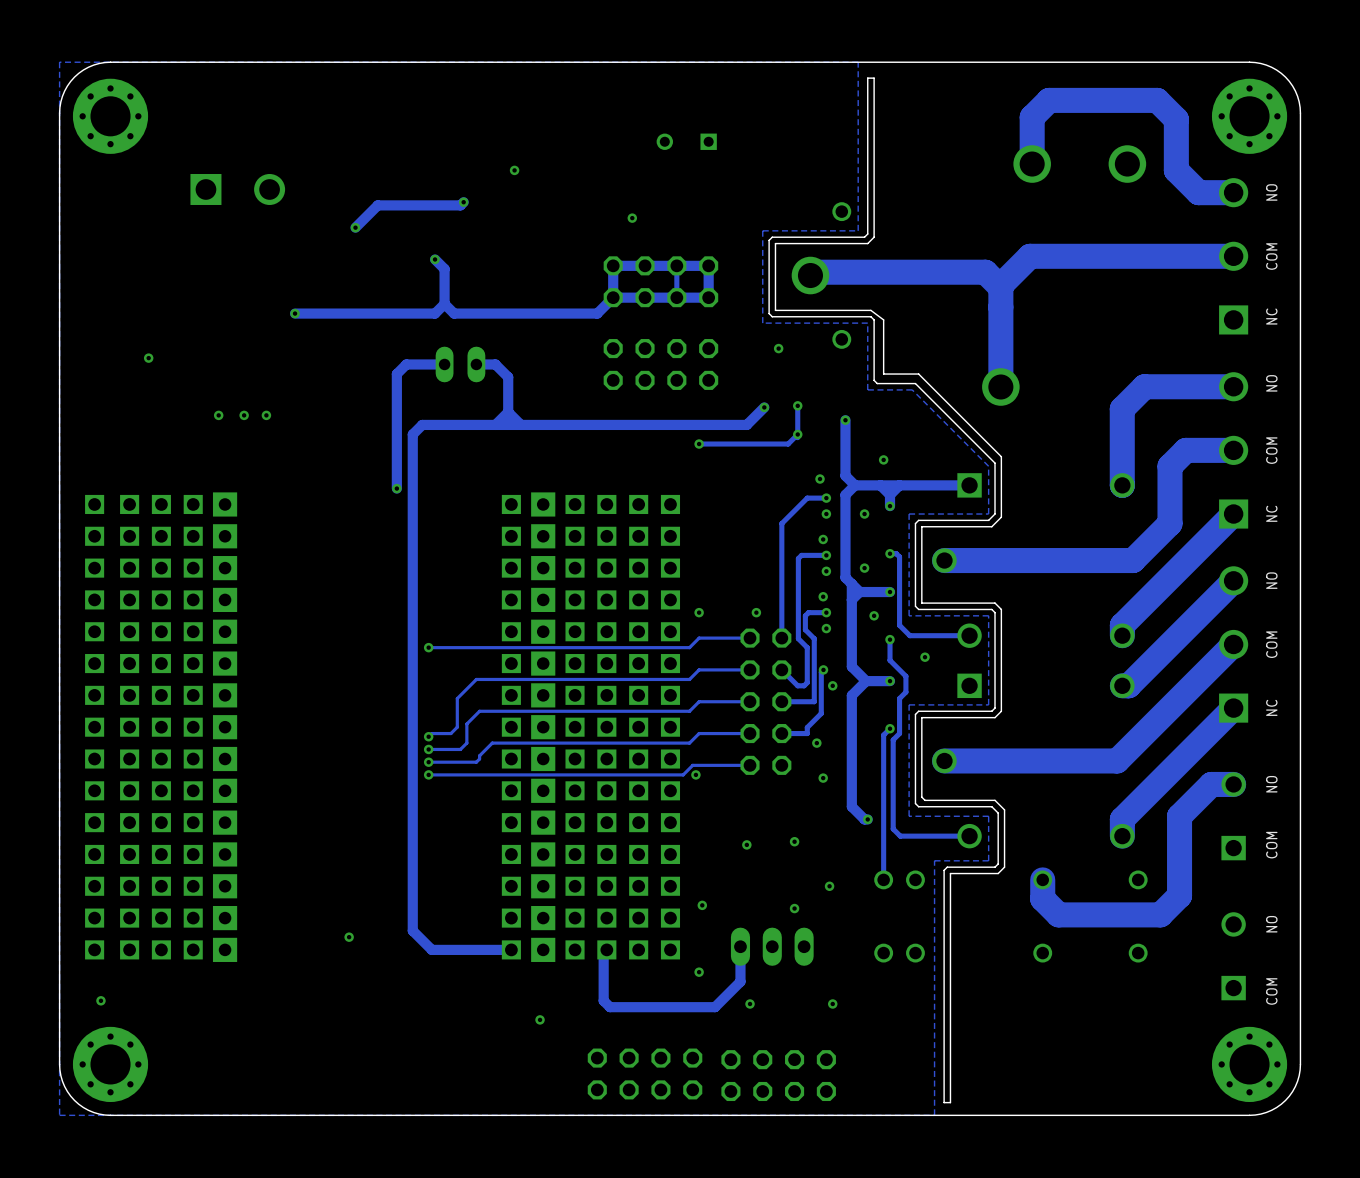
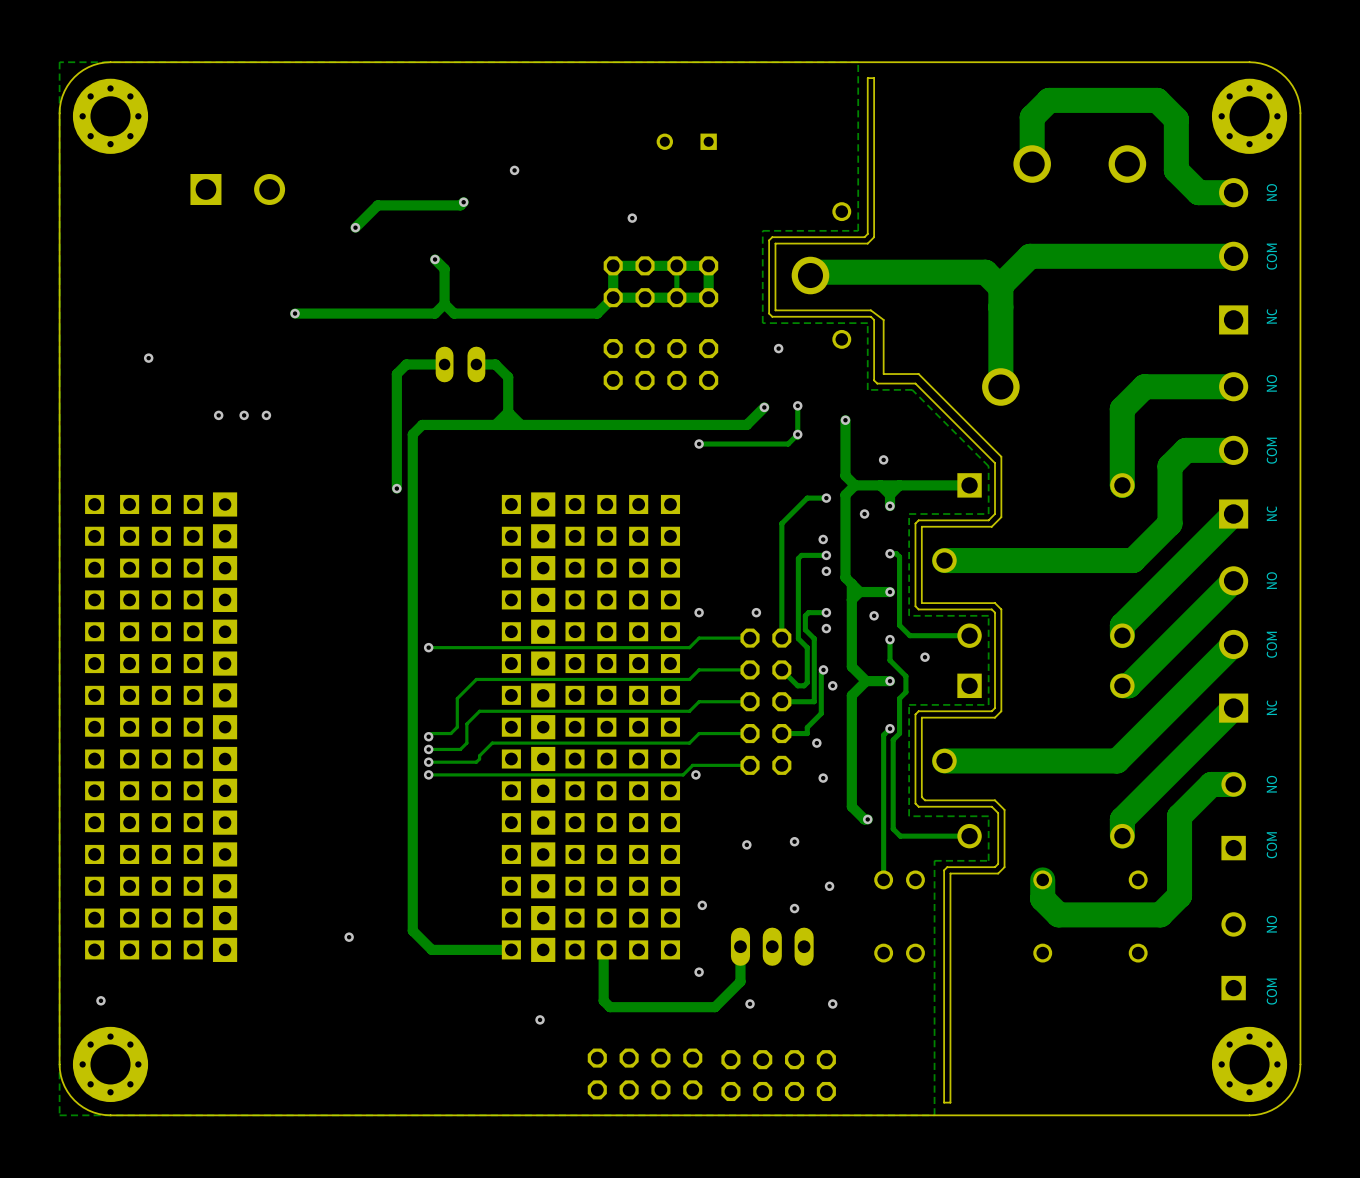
via: (820, 479) -> none
via: (826, 514) -> none
via: (864, 568) -> none
via: (823, 596) -> none

